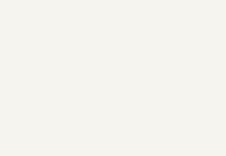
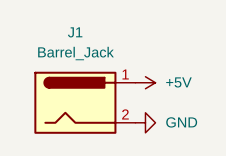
power symbol: none -> +5V (145, 82)
J1: none -> Barrel_Jack (84, 102)
power symbol: none -> GND (145, 122)

